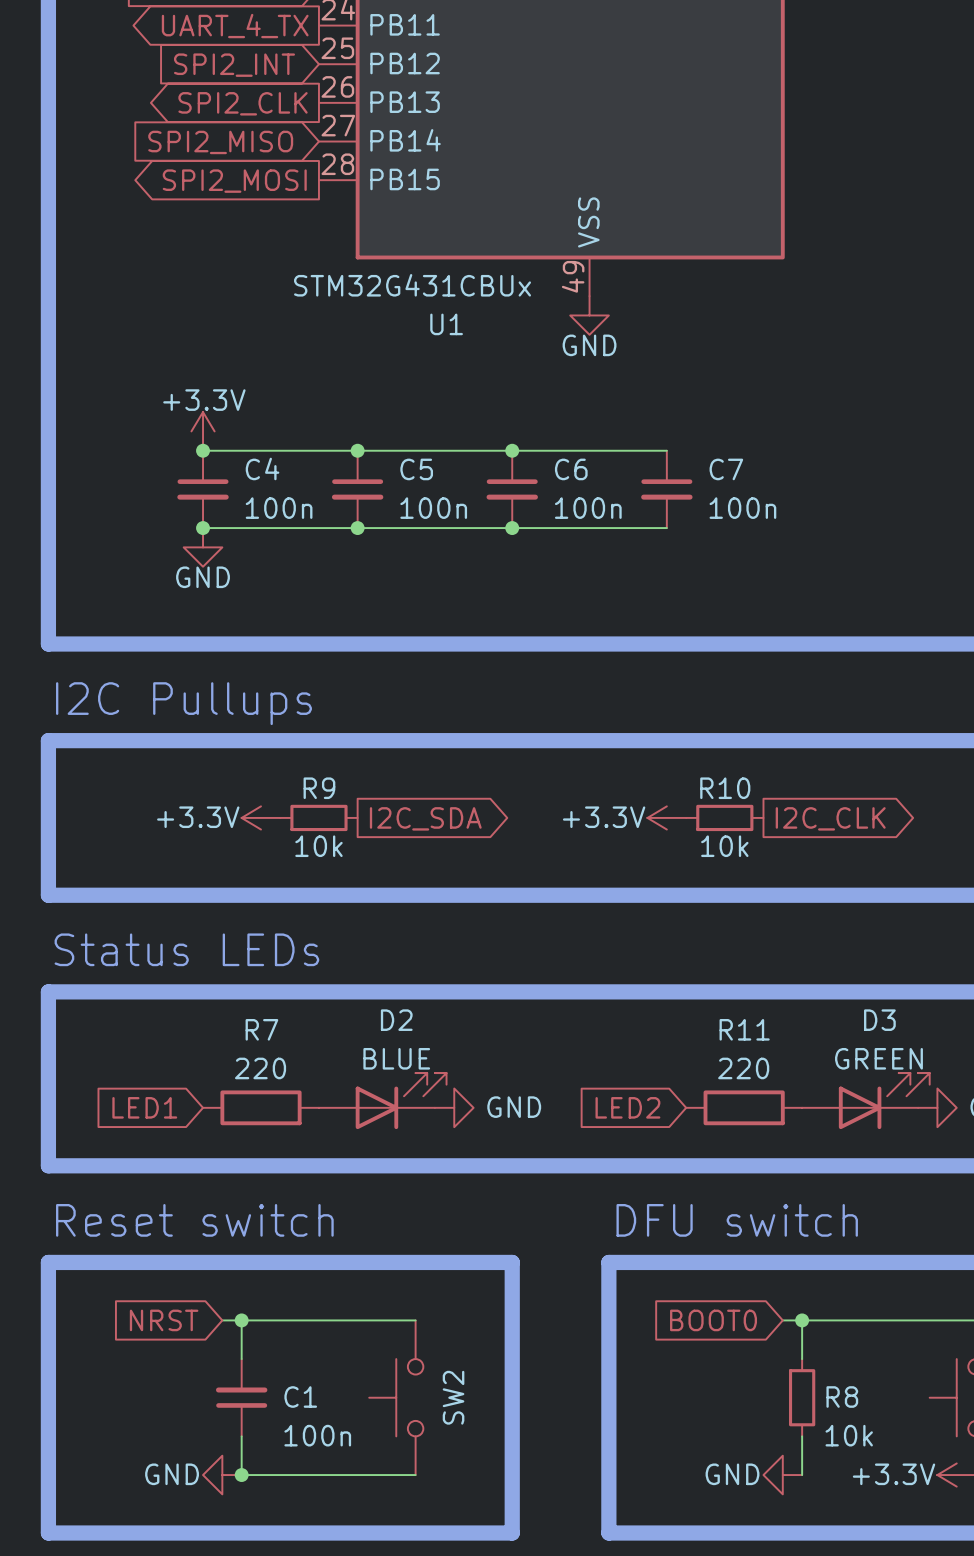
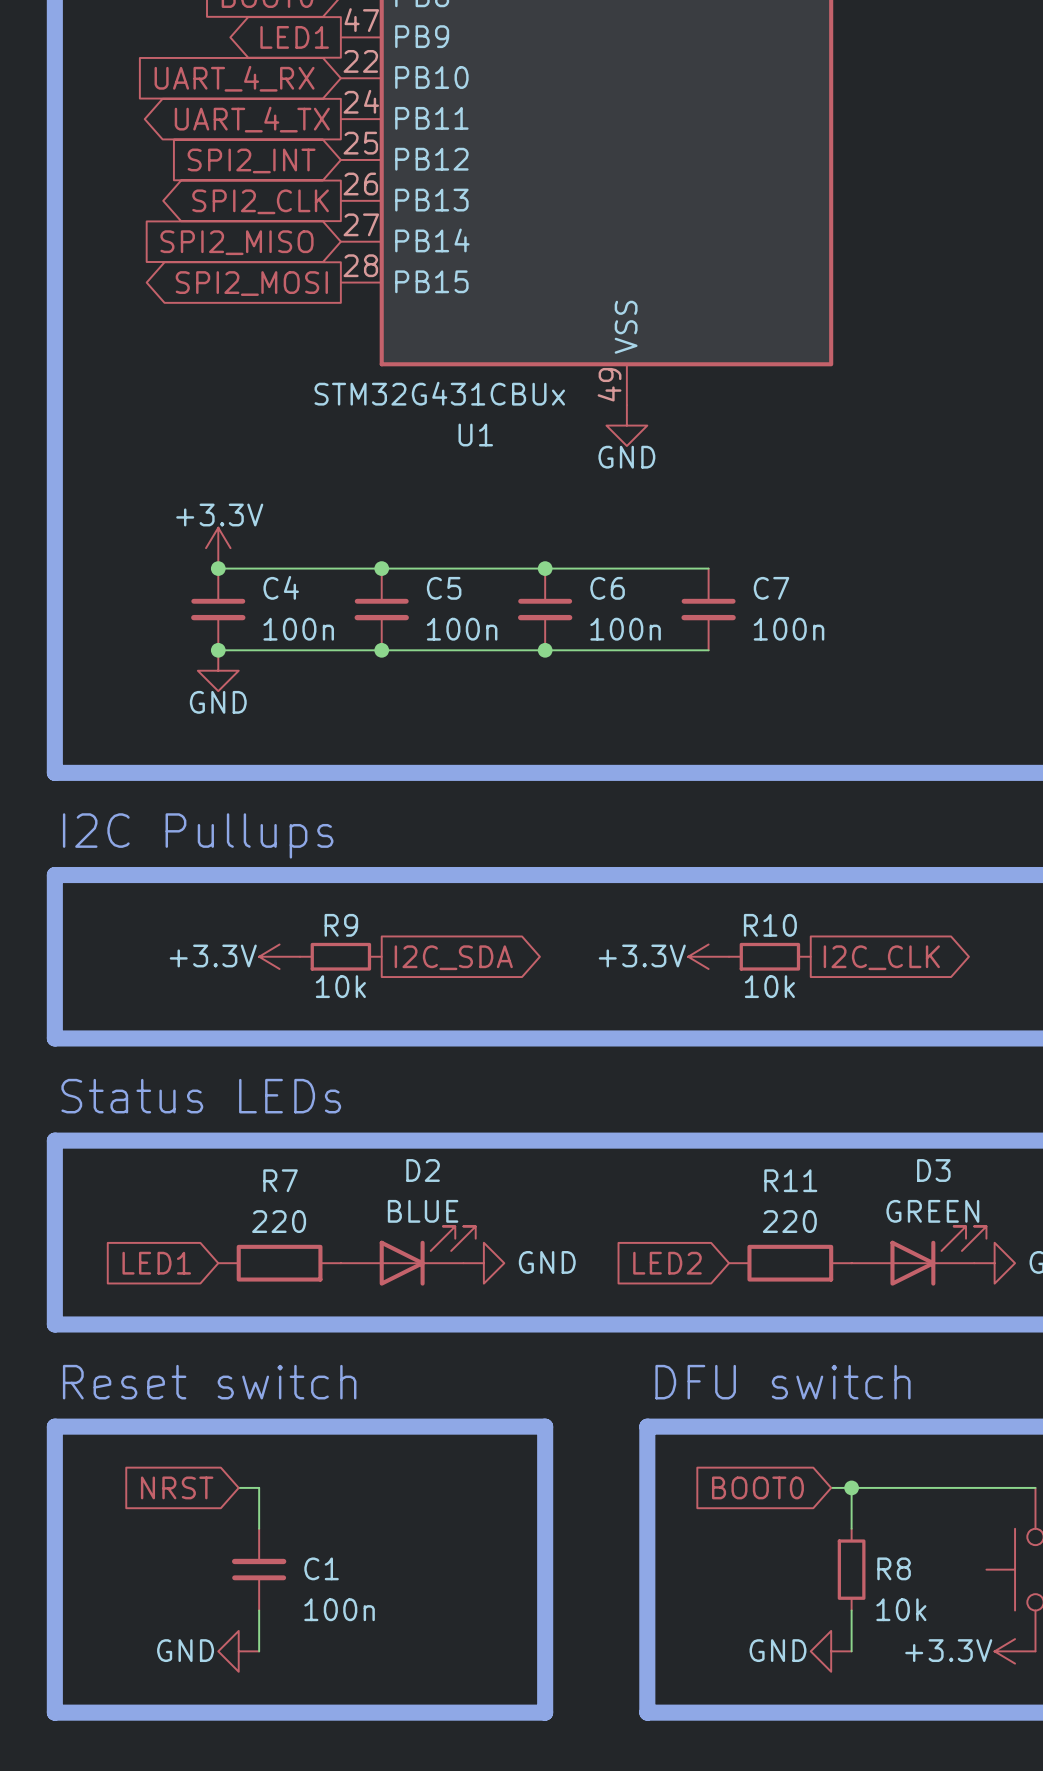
wire: (241, 1320) (415, 1320) -> none
junction: (241, 1320) -> none
SW2: (396, 1397) -> none
wire: (241, 1475) (415, 1475) -> none
junction: (241, 1475) -> none

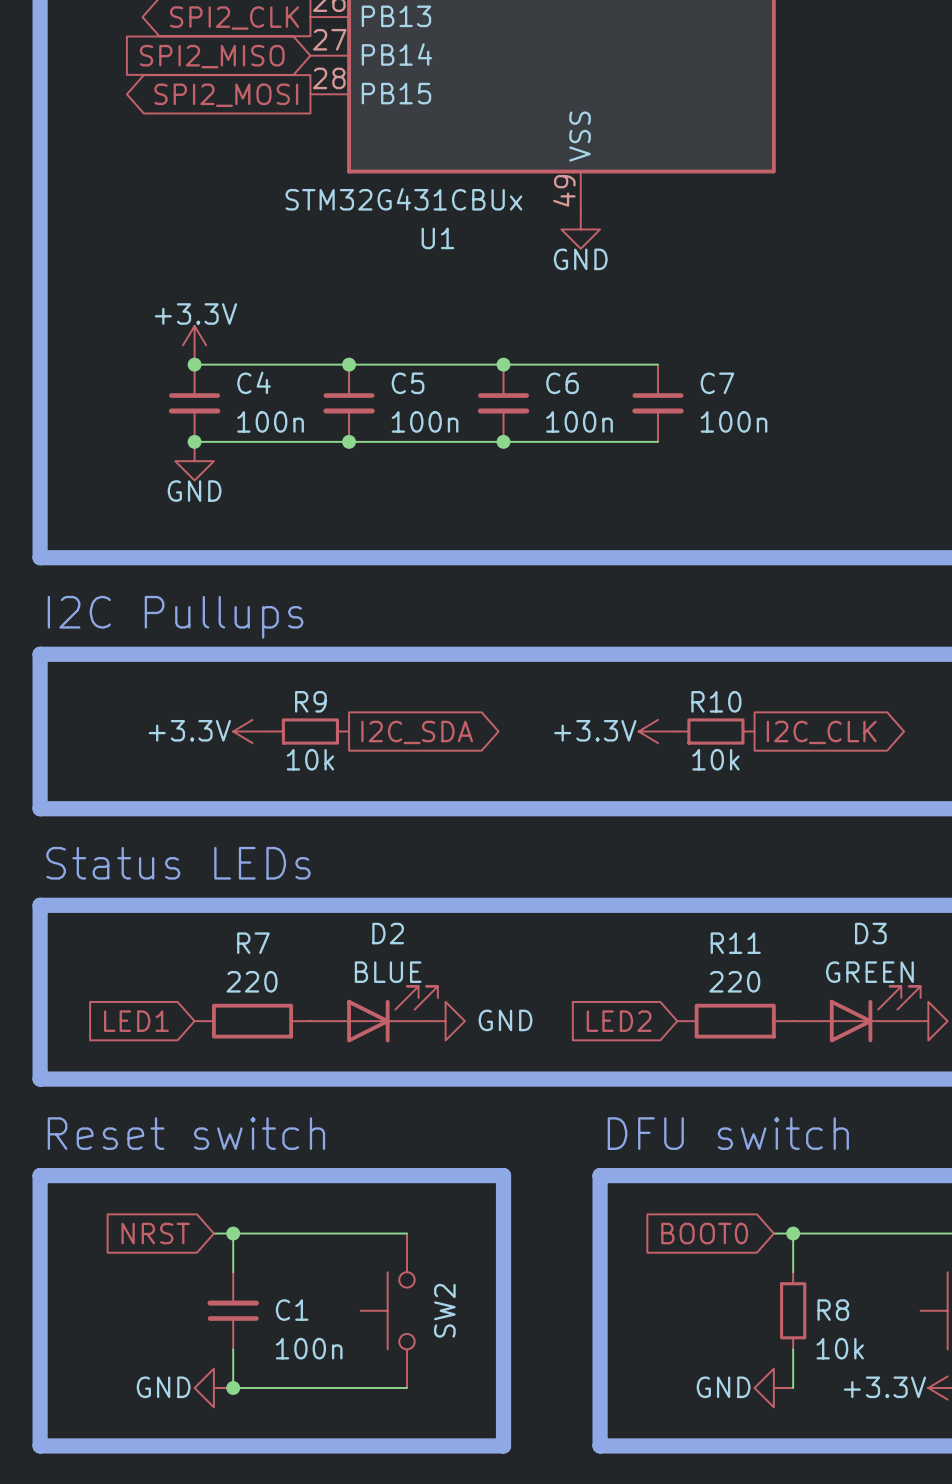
wire: none -> (233, 1233) (406, 1233)
junction: none -> (233, 1233)
SW2: none -> (387, 1310)
wire: none -> (233, 1388) (406, 1388)
junction: none -> (233, 1388)

